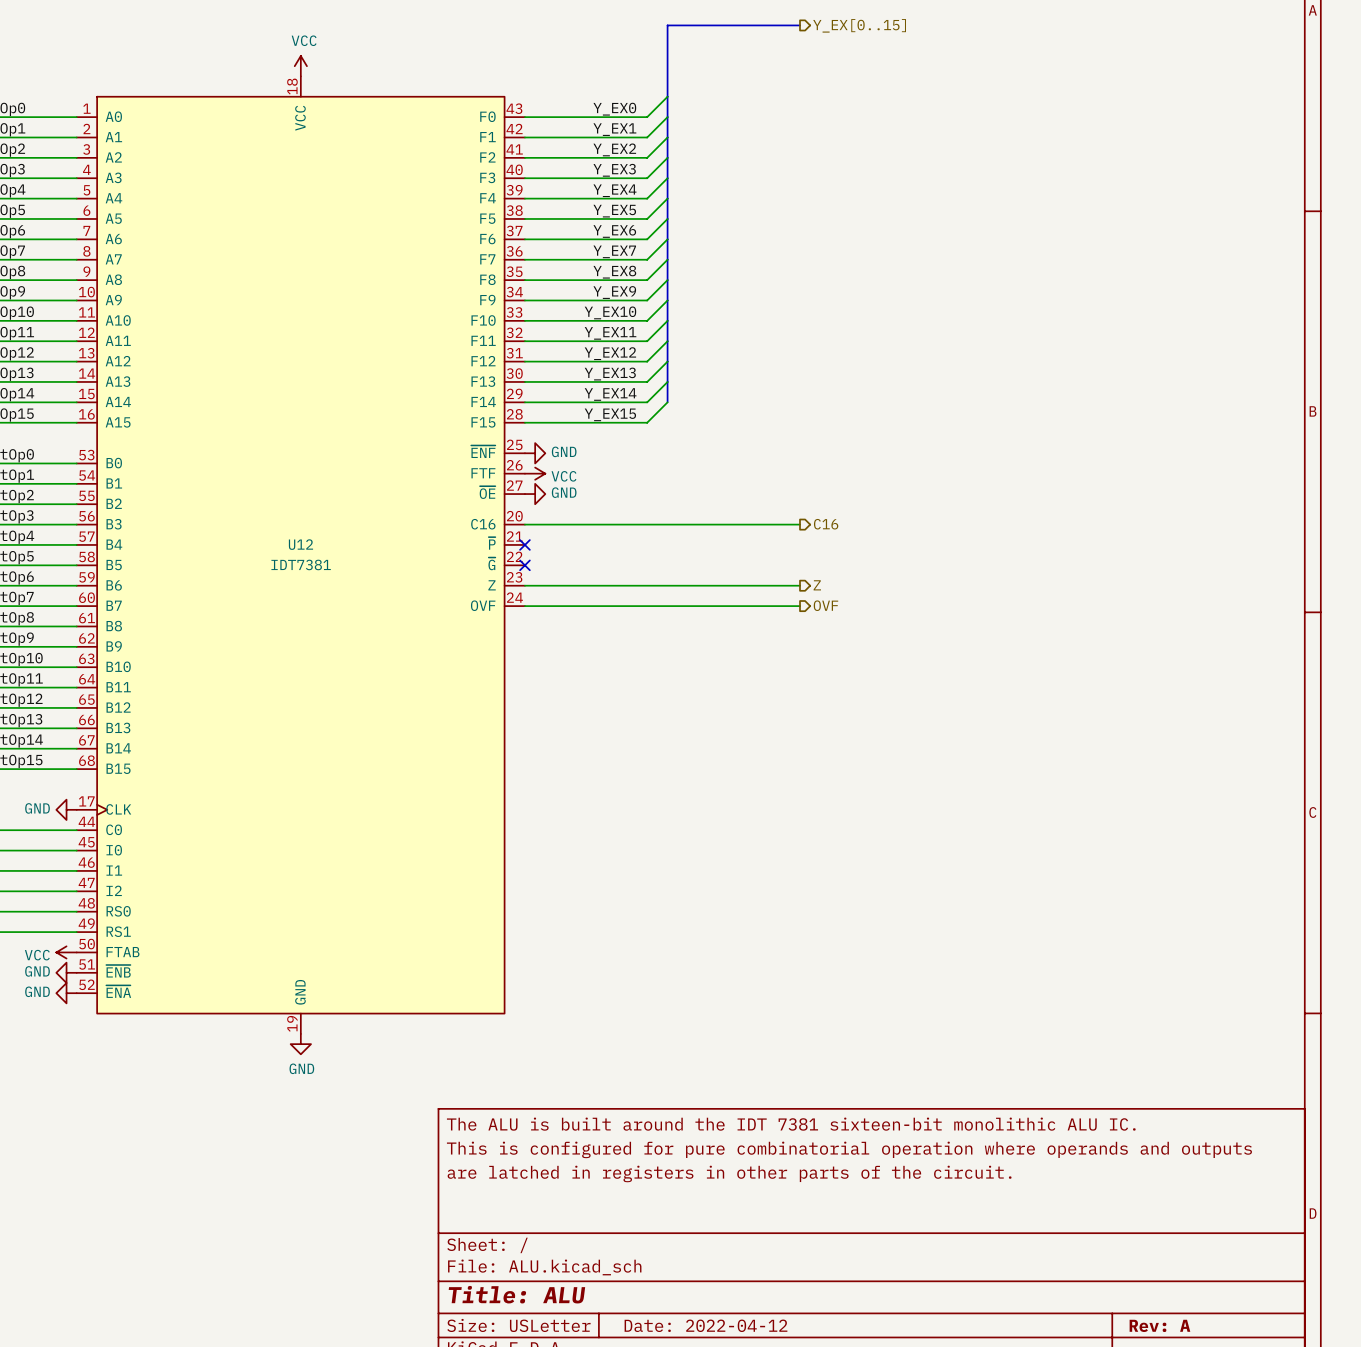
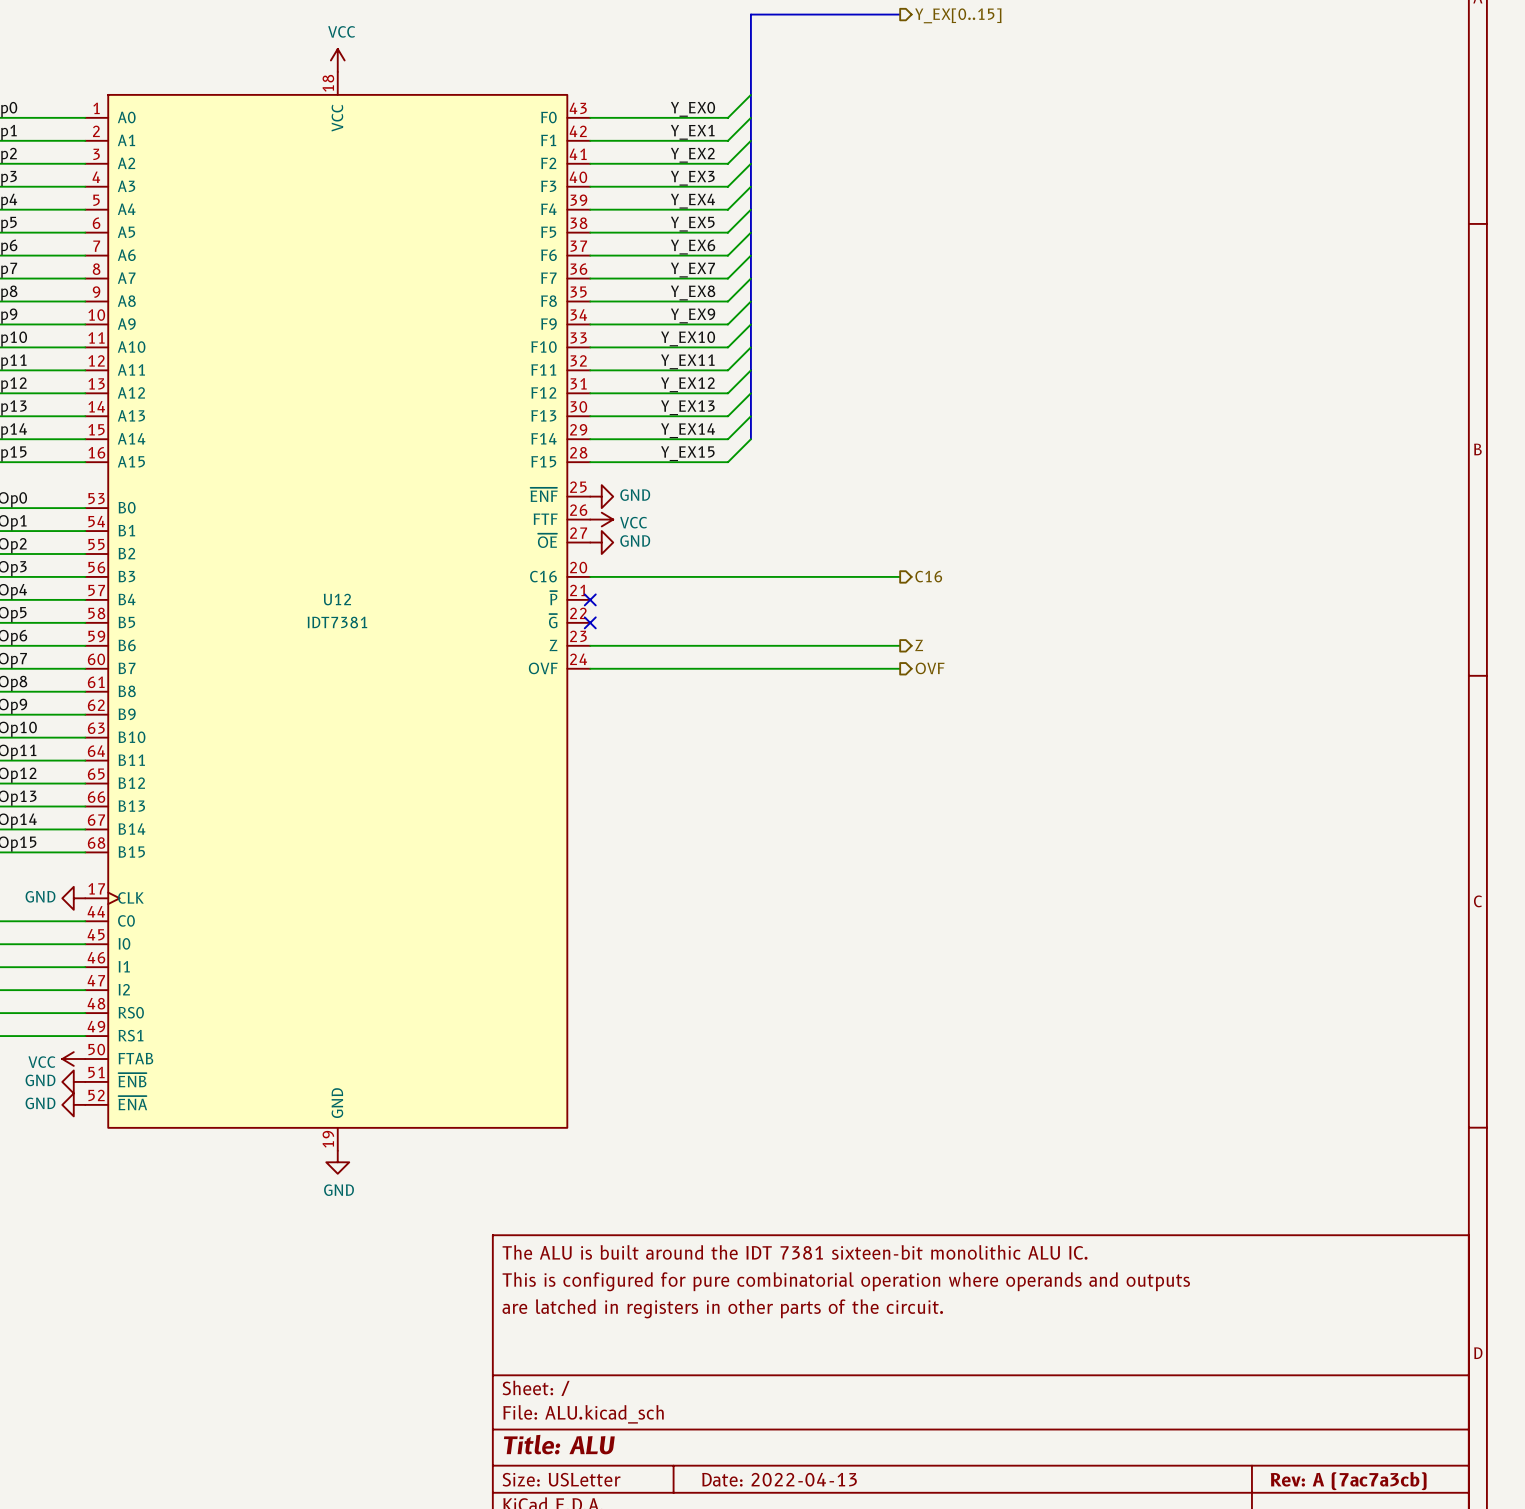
title block: Date: 2022-04-12 (705, 1325) -> Date: 2022-04-13 (779, 1479)
title block: Rev: A (1159, 1325) -> Rev: A (7ac7a3cb) (1348, 1481)

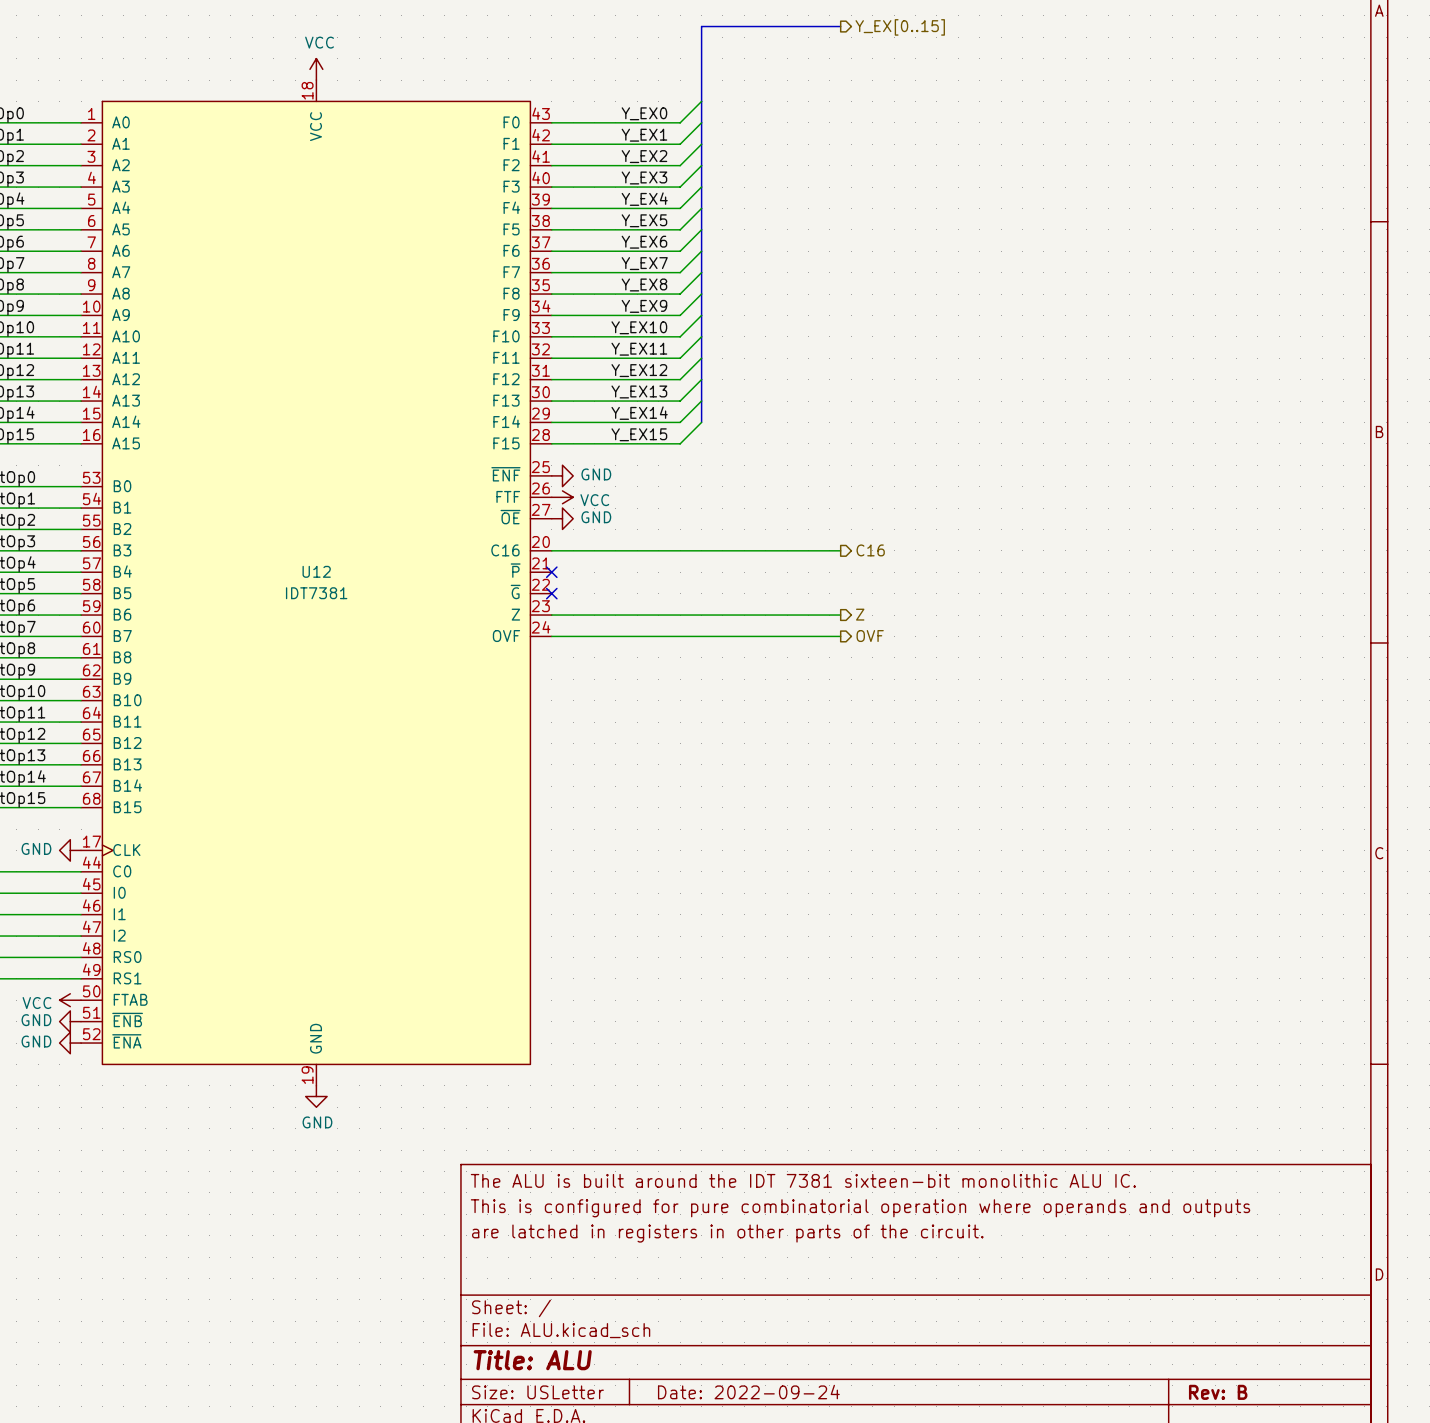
title block: Date: 2022-04-13 (779, 1479) -> Date: 2022-09-24 (748, 1392)
title block: Rev: A (7ac7a3cb) (1348, 1481) -> Rev: B (1218, 1392)

